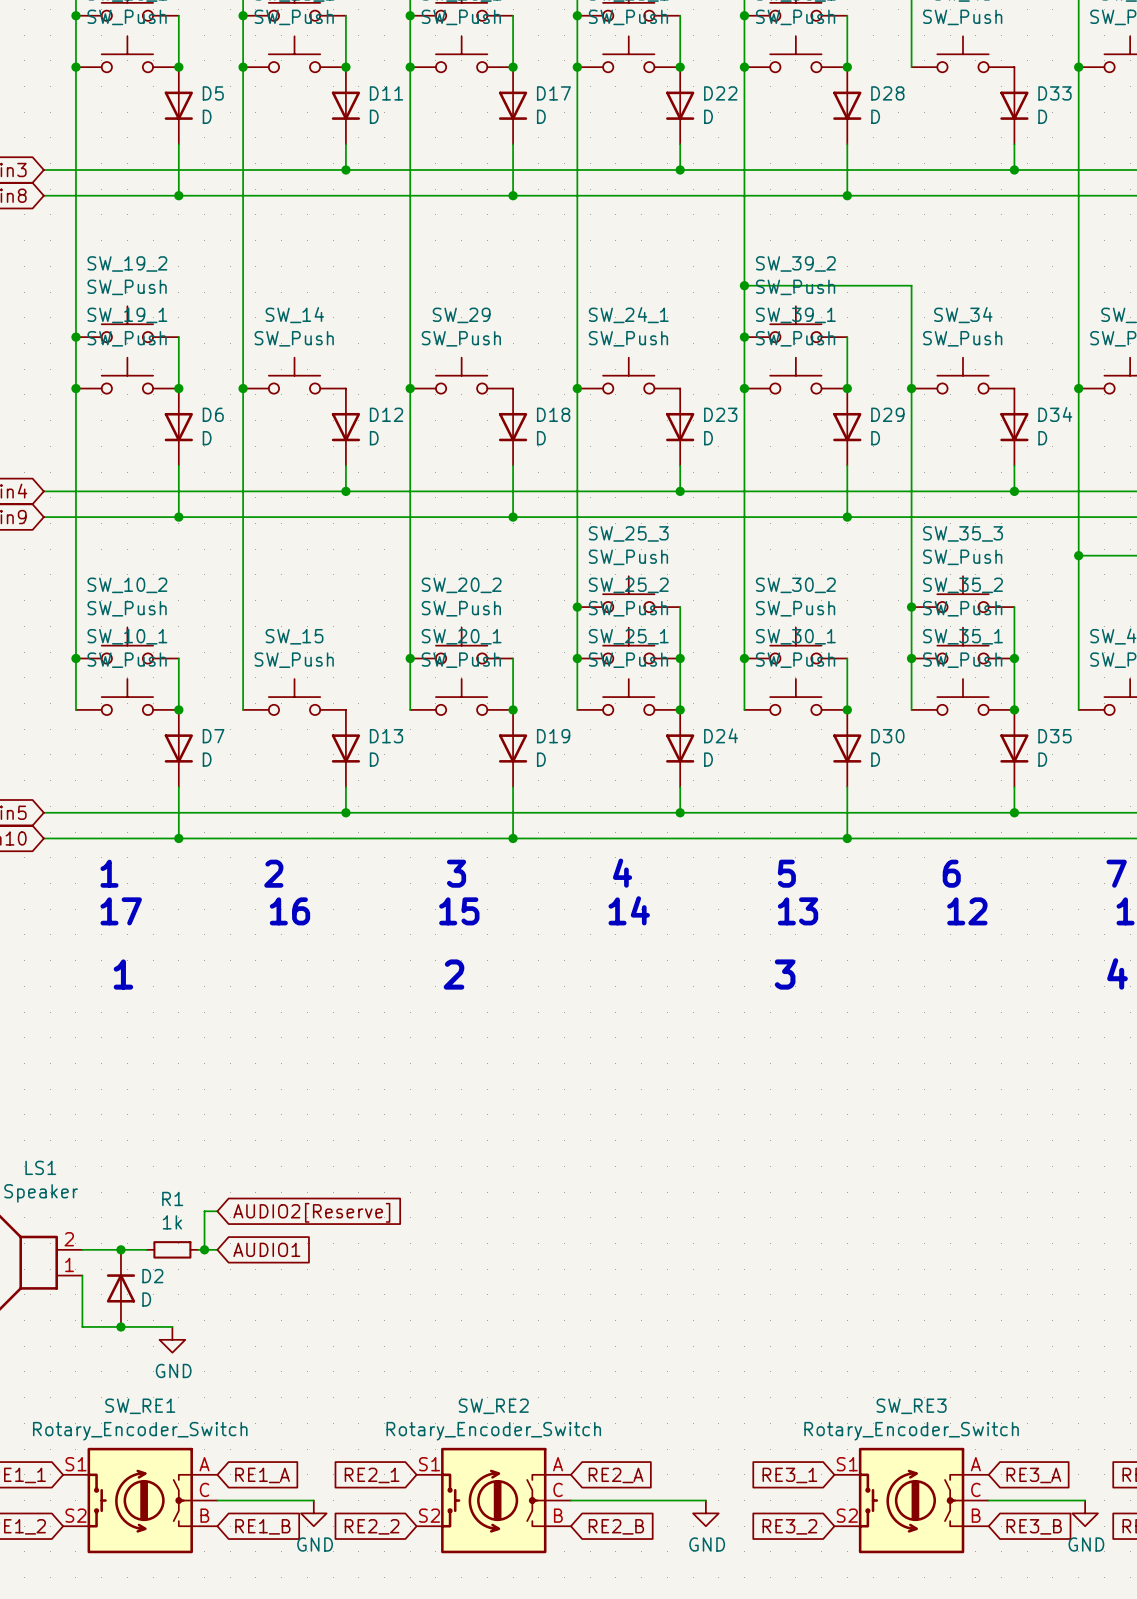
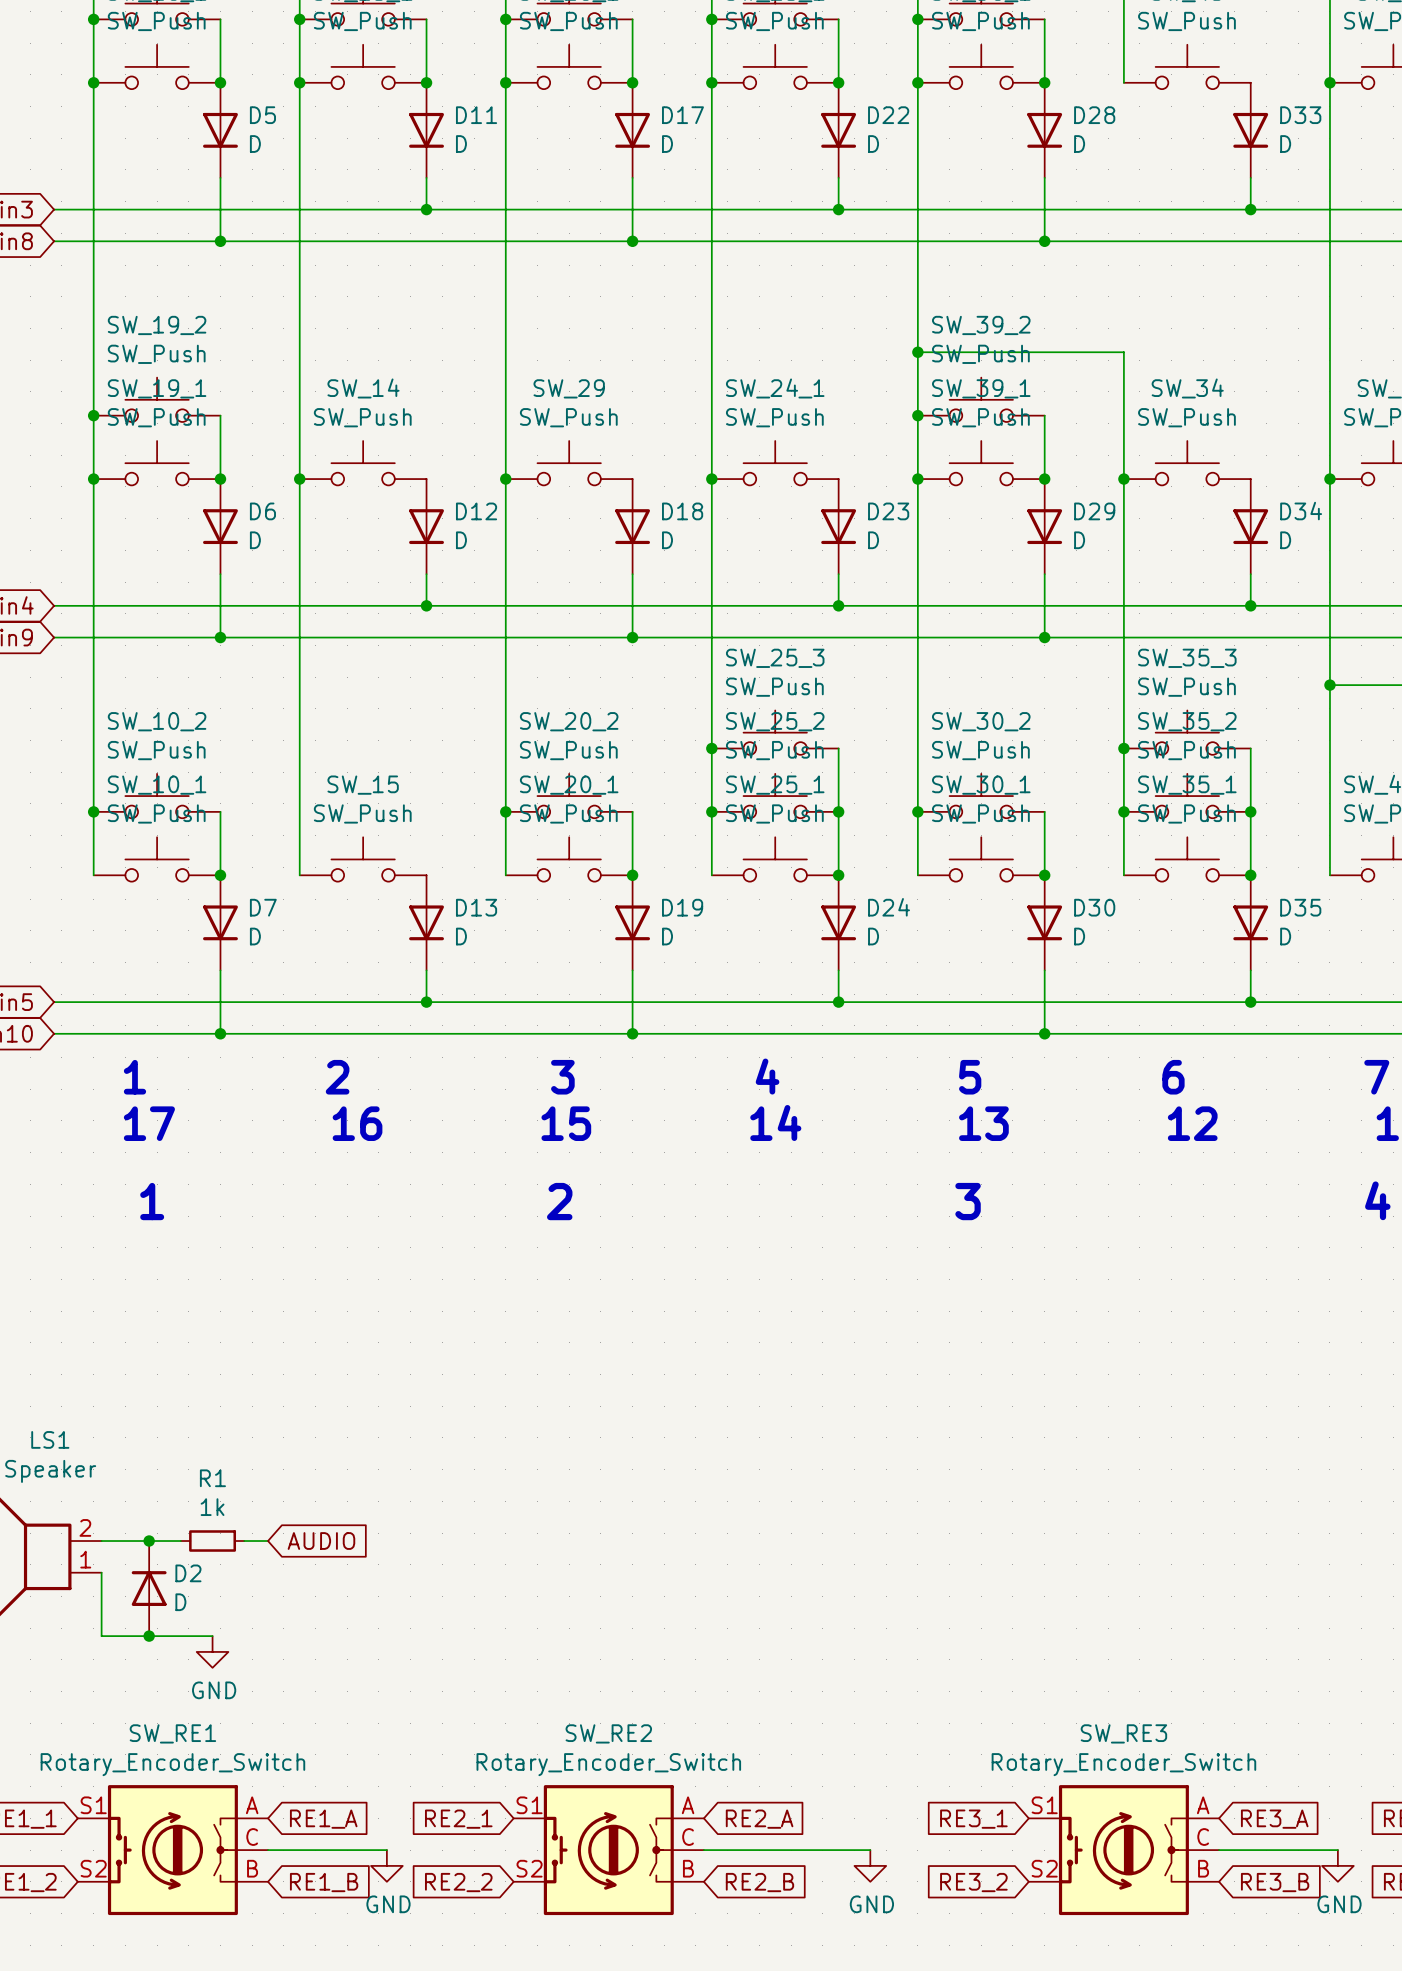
wire: (217, 1211) (204, 1211) (204, 1249) -> none
global label: AUDIO2[Reserve] (311, 1212) -> none
junction: (204, 1249) -> none
global label: AUDIO1 (266, 1249) -> AUDIO (321, 1541)

